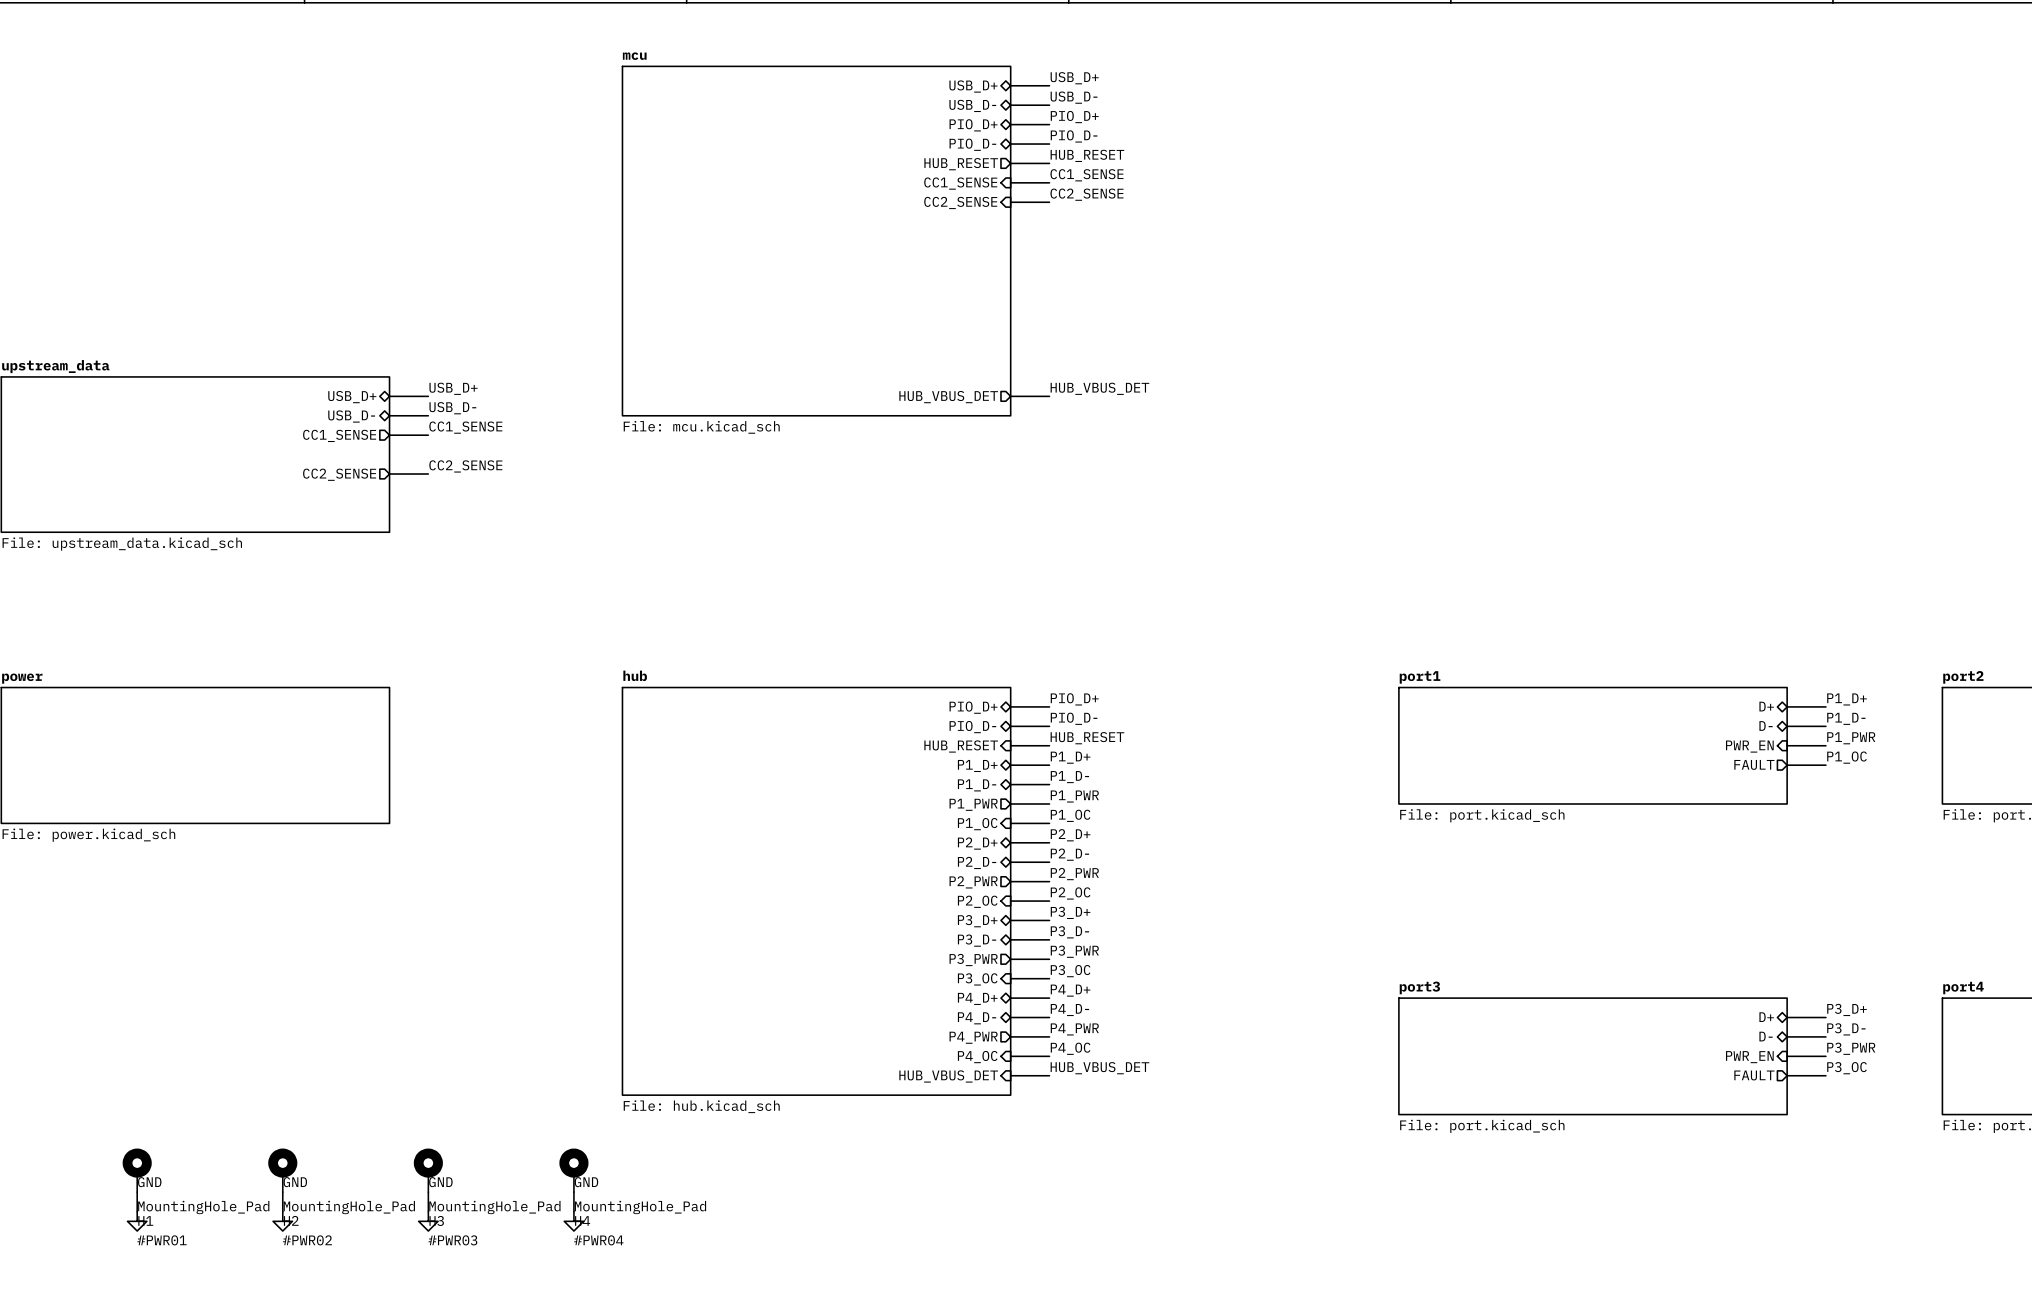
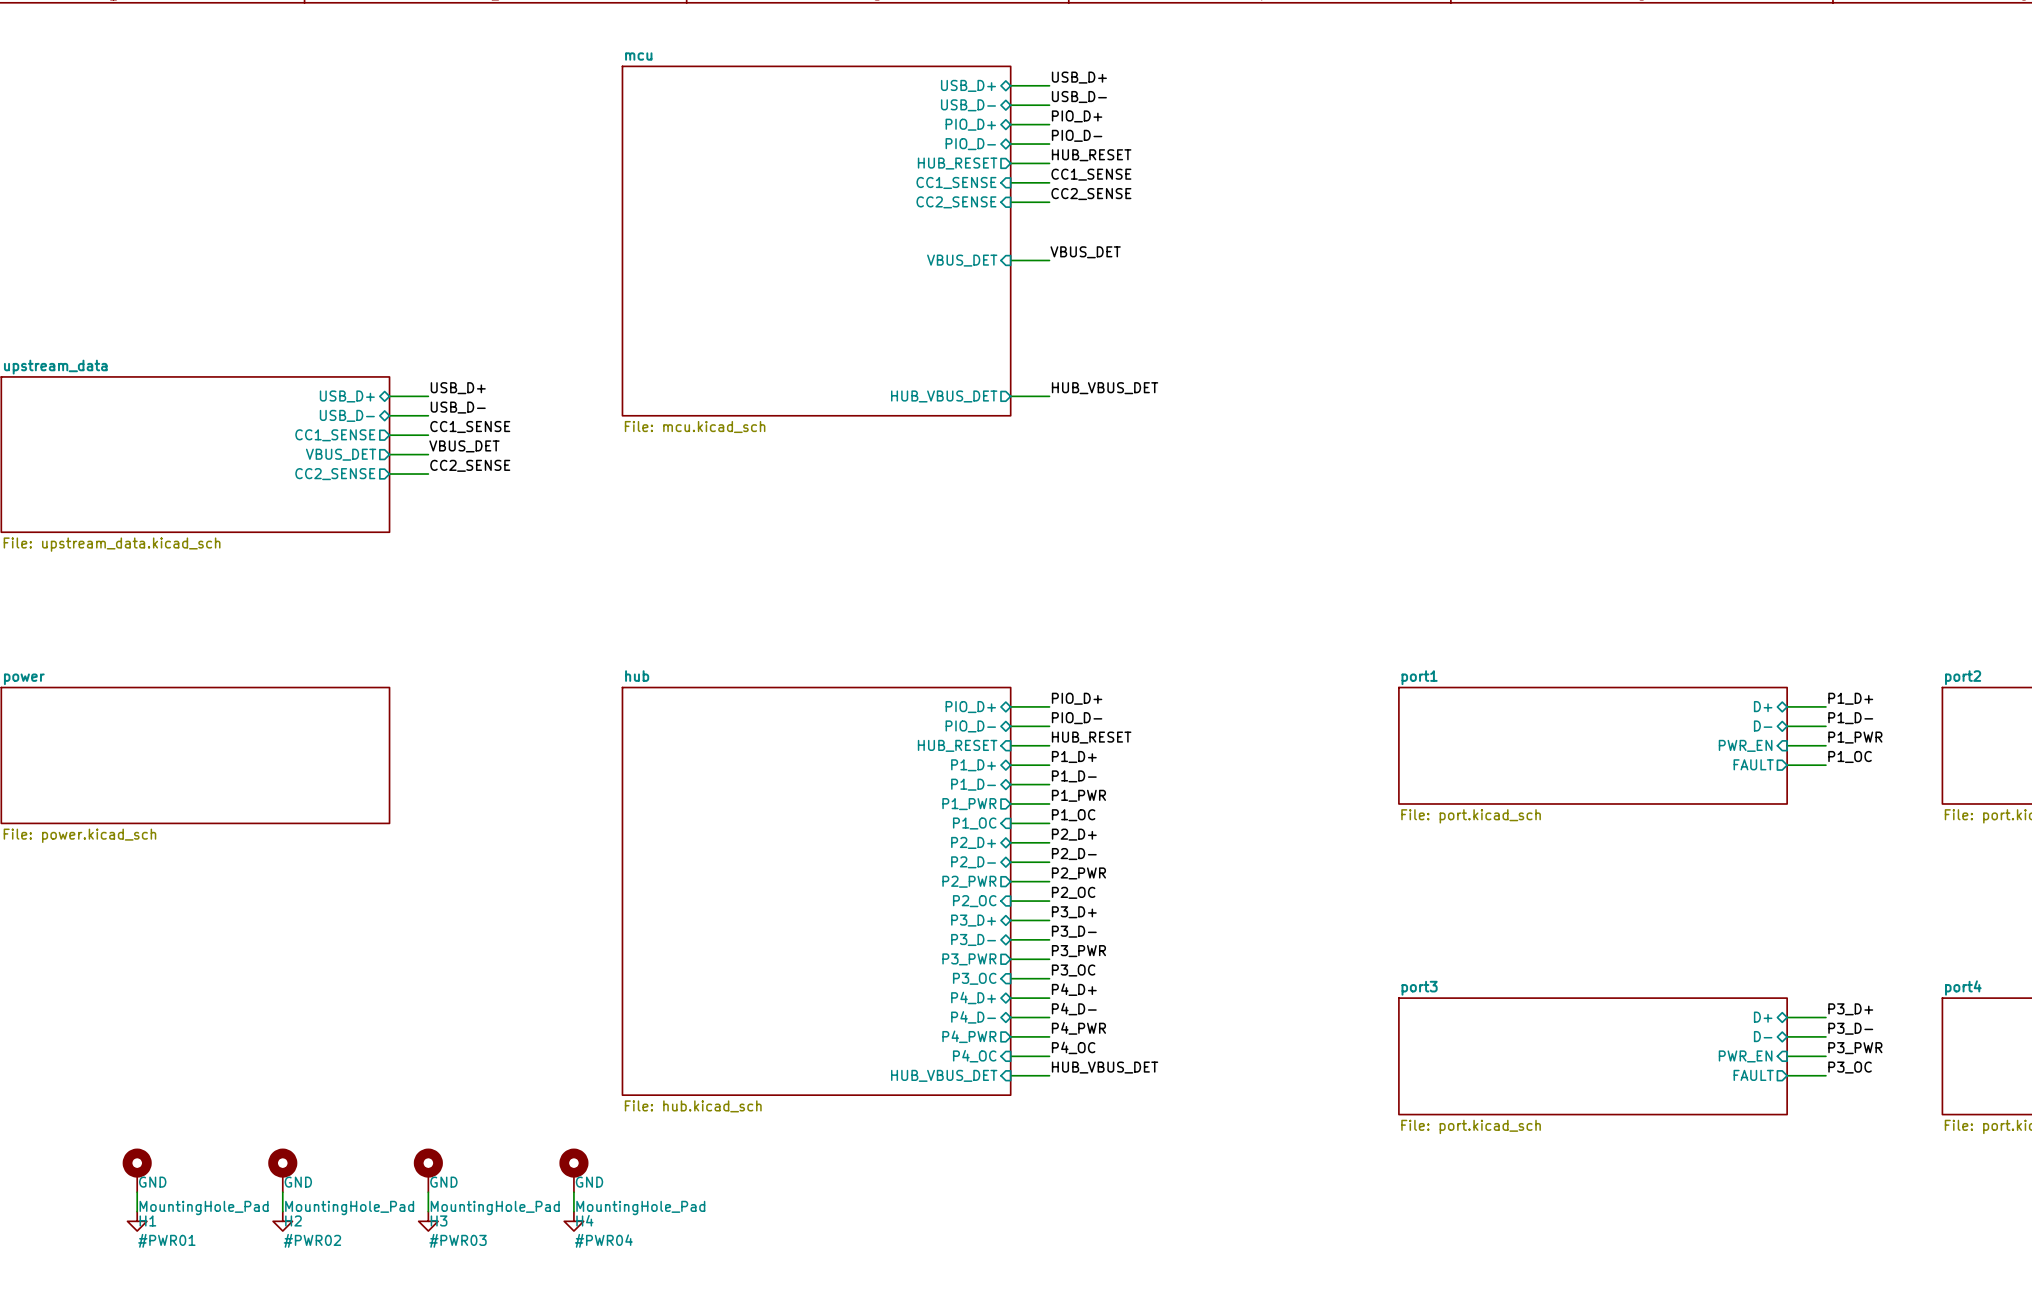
label: none -> VBUS_DET (1085, 252)
wire: none -> (1010, 260) (1049, 260)
sheet pin: none -> VBUS_DET (962, 260)
label: none -> VBUS_DET (464, 446)
wire: none -> (389, 454) (428, 454)
sheet pin: none -> VBUS_DET (341, 454)

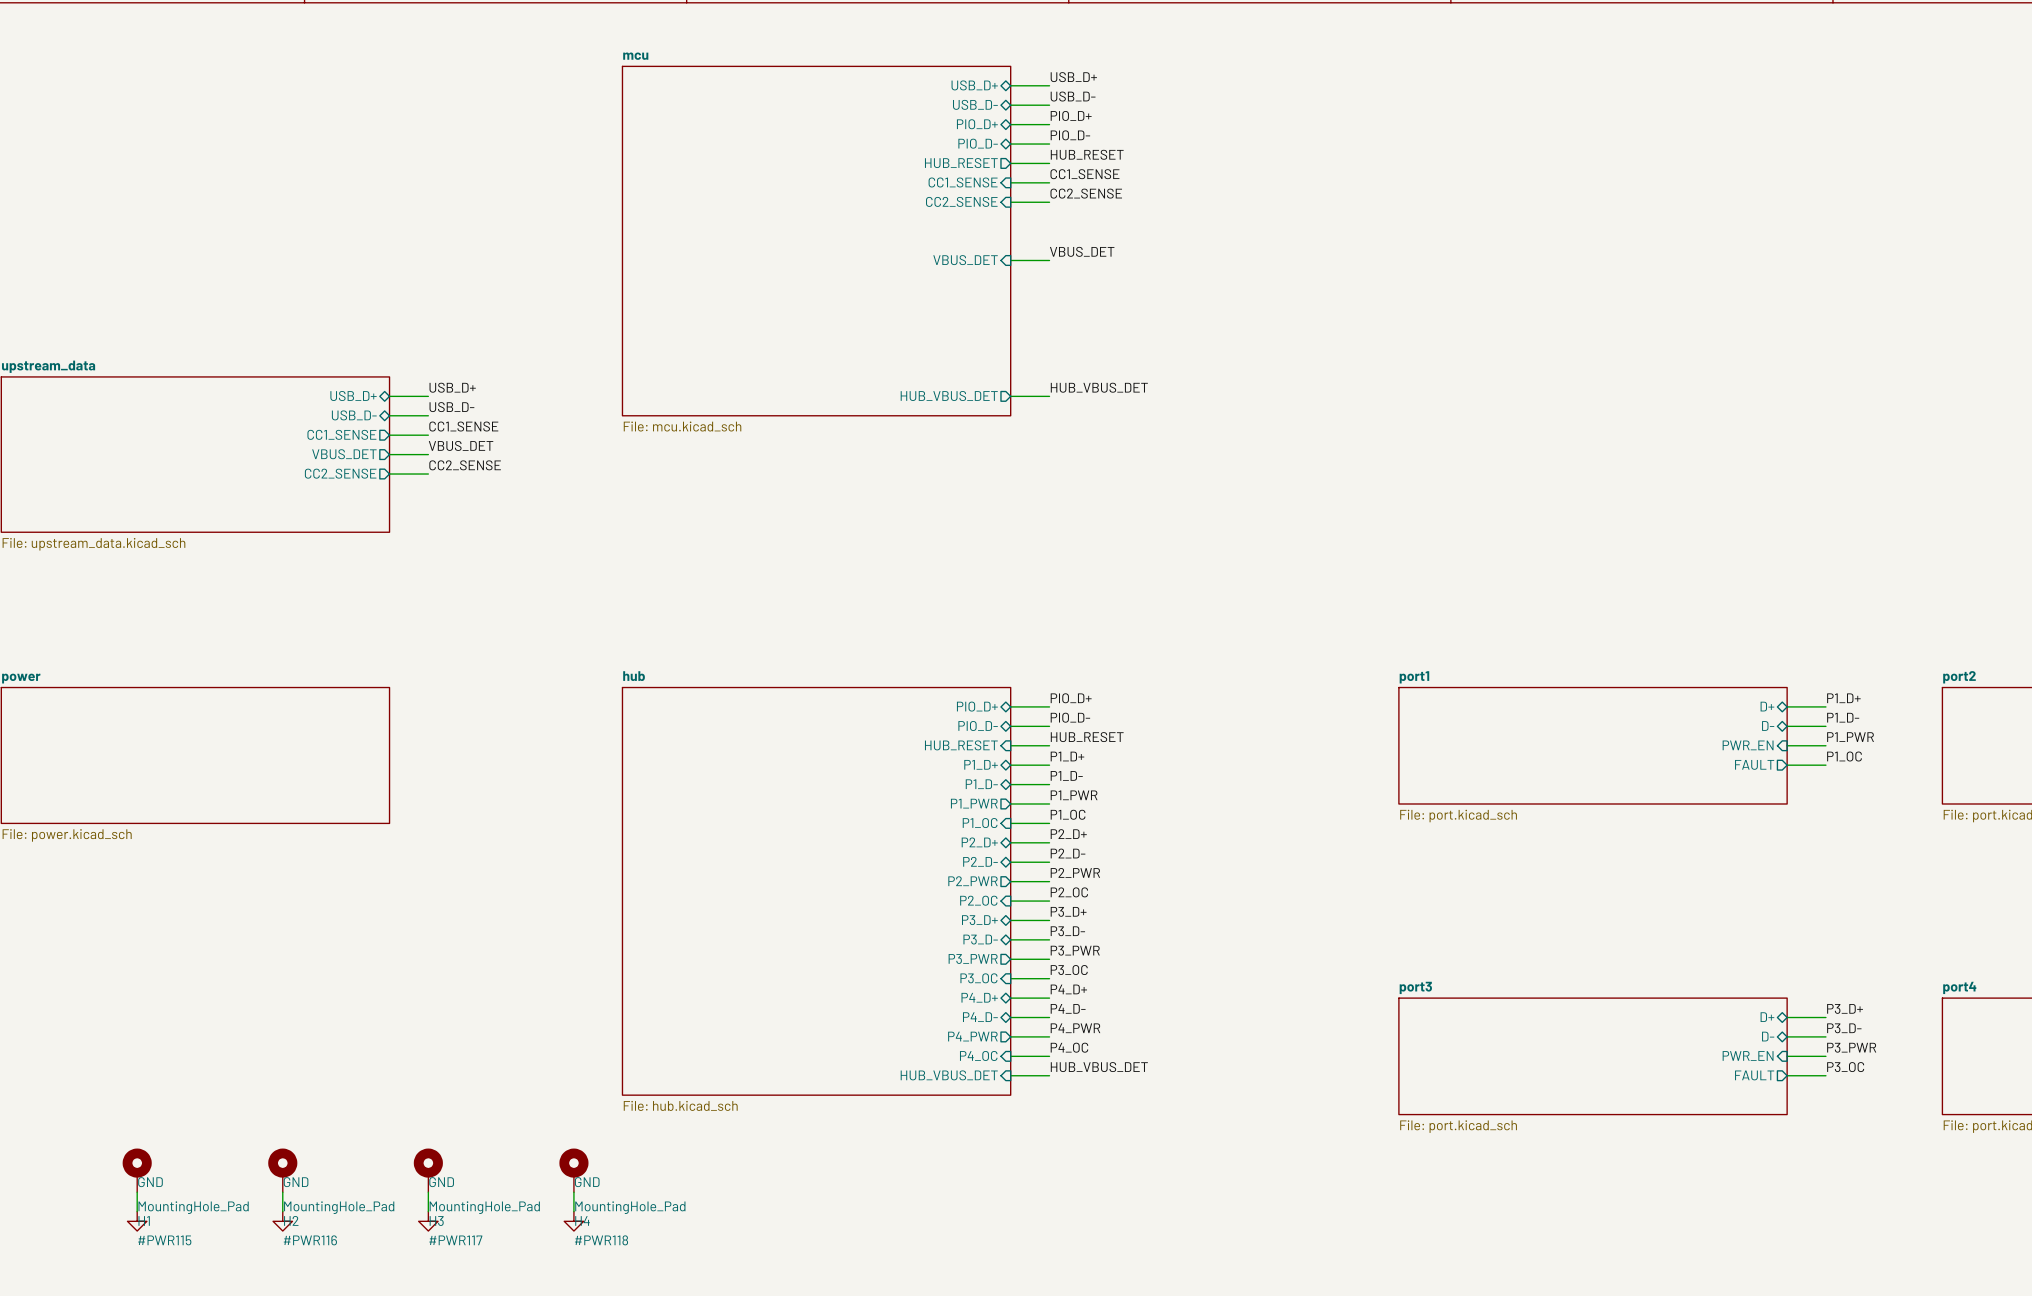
#PWR01 name: #PWR01 (166, 1240) -> #PWR115 (164, 1240)
#PWR02 name: #PWR02 (312, 1240) -> #PWR116 (310, 1240)
#PWR03 name: #PWR03 (458, 1240) -> #PWR117 (455, 1240)
#PWR04 name: #PWR04 (603, 1240) -> #PWR118 (601, 1240)

